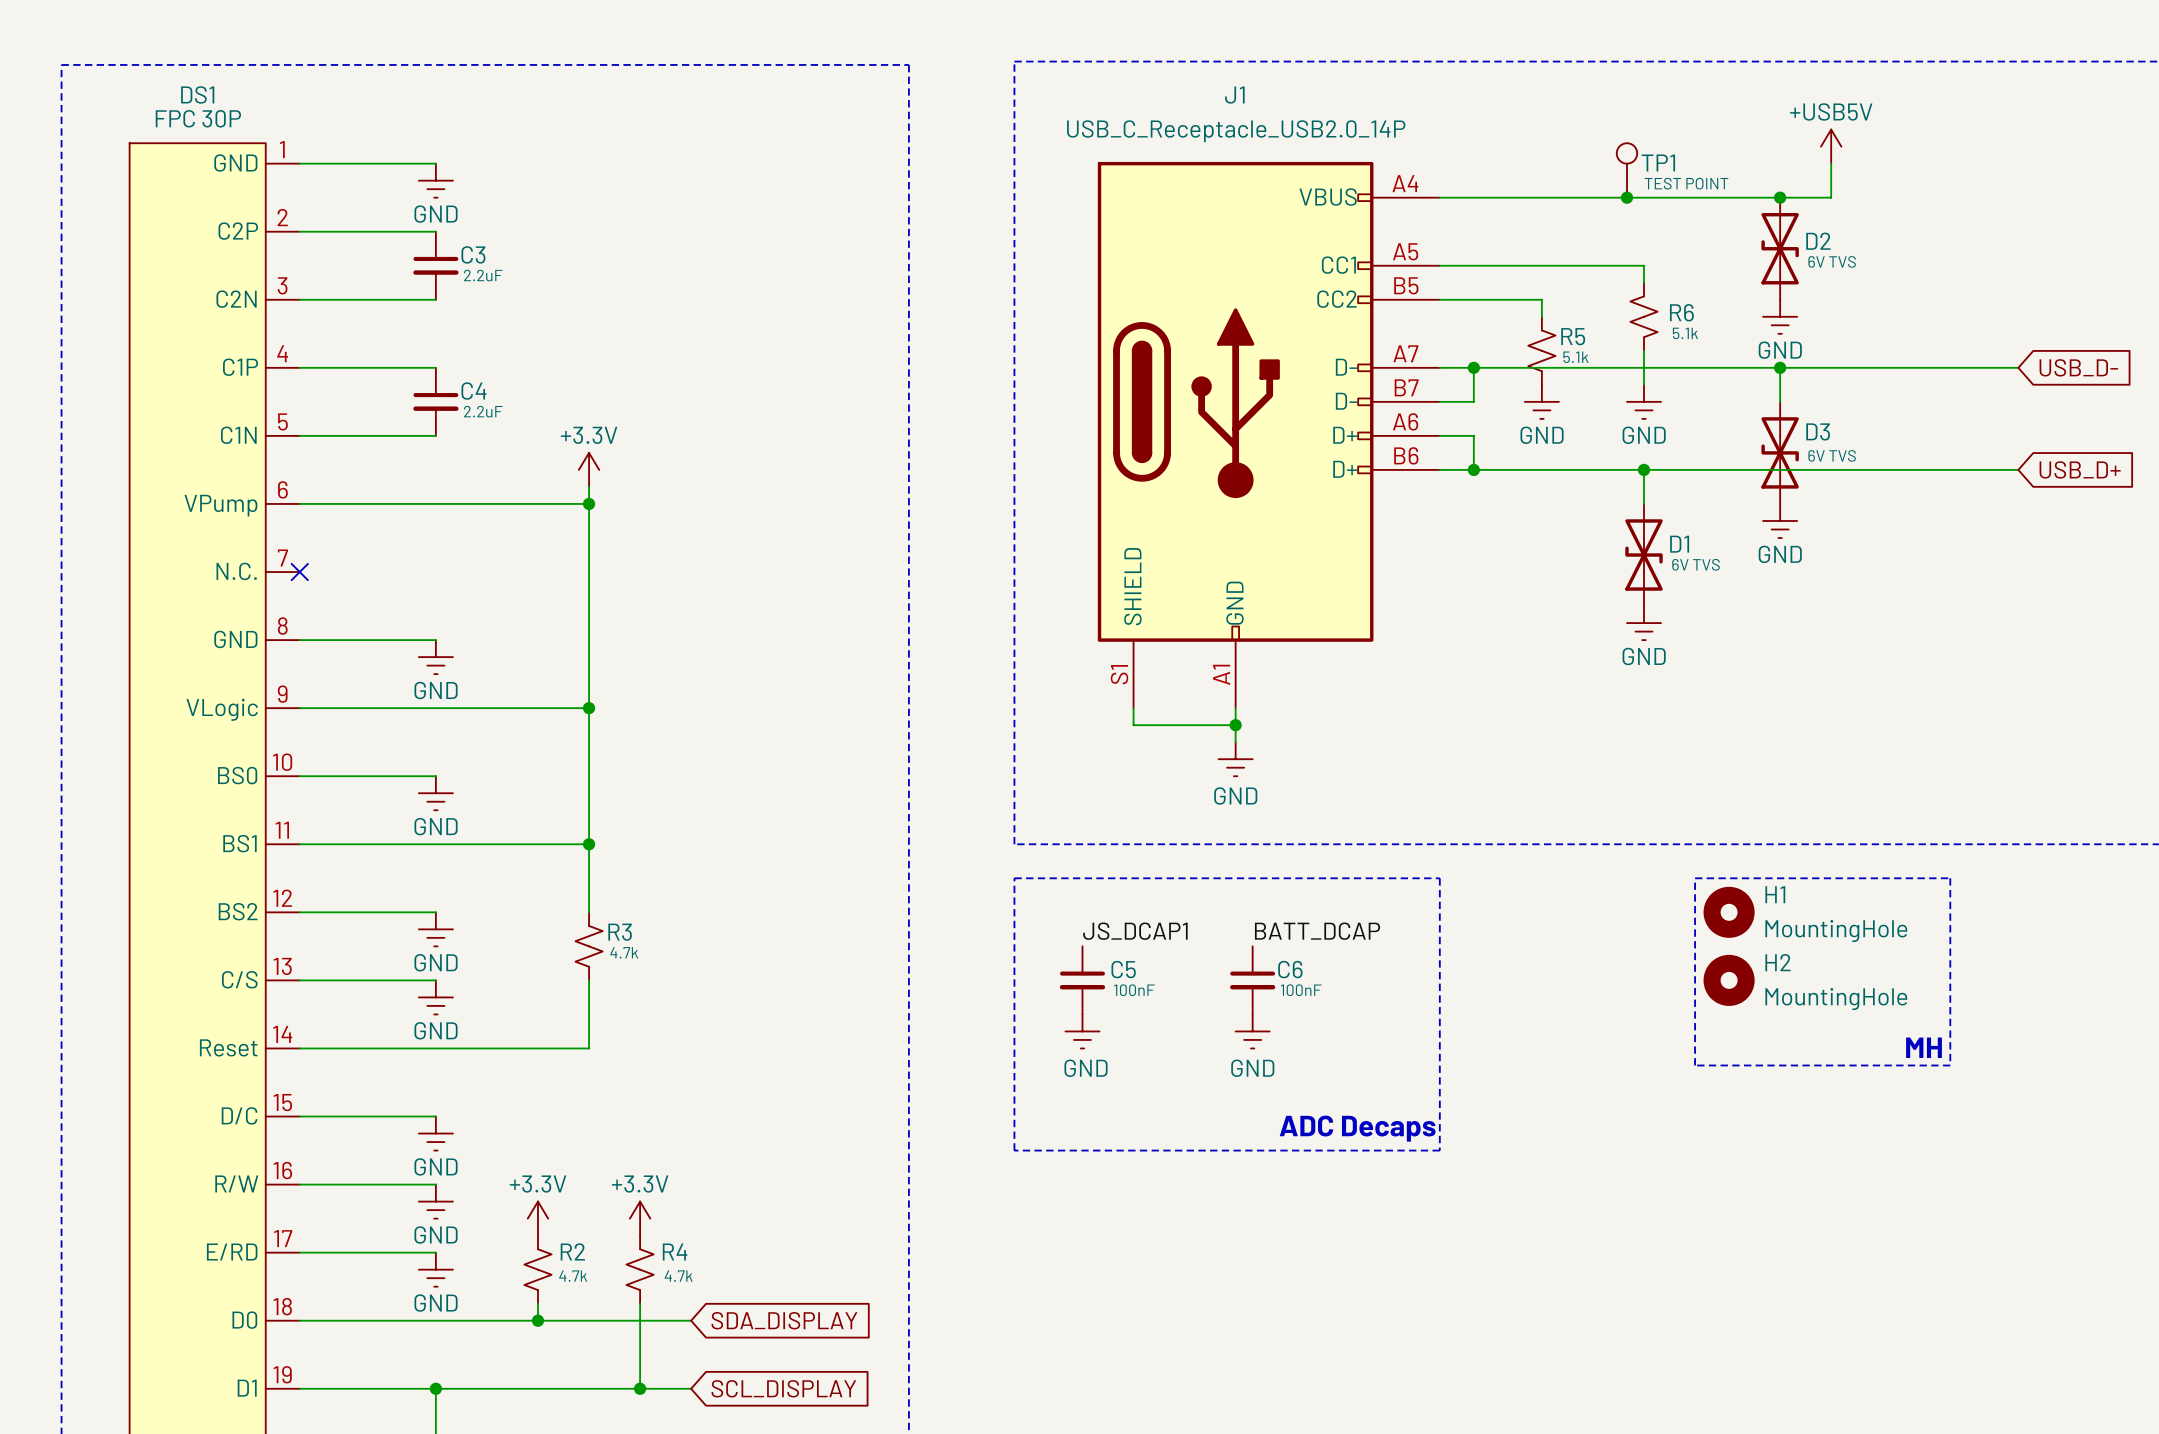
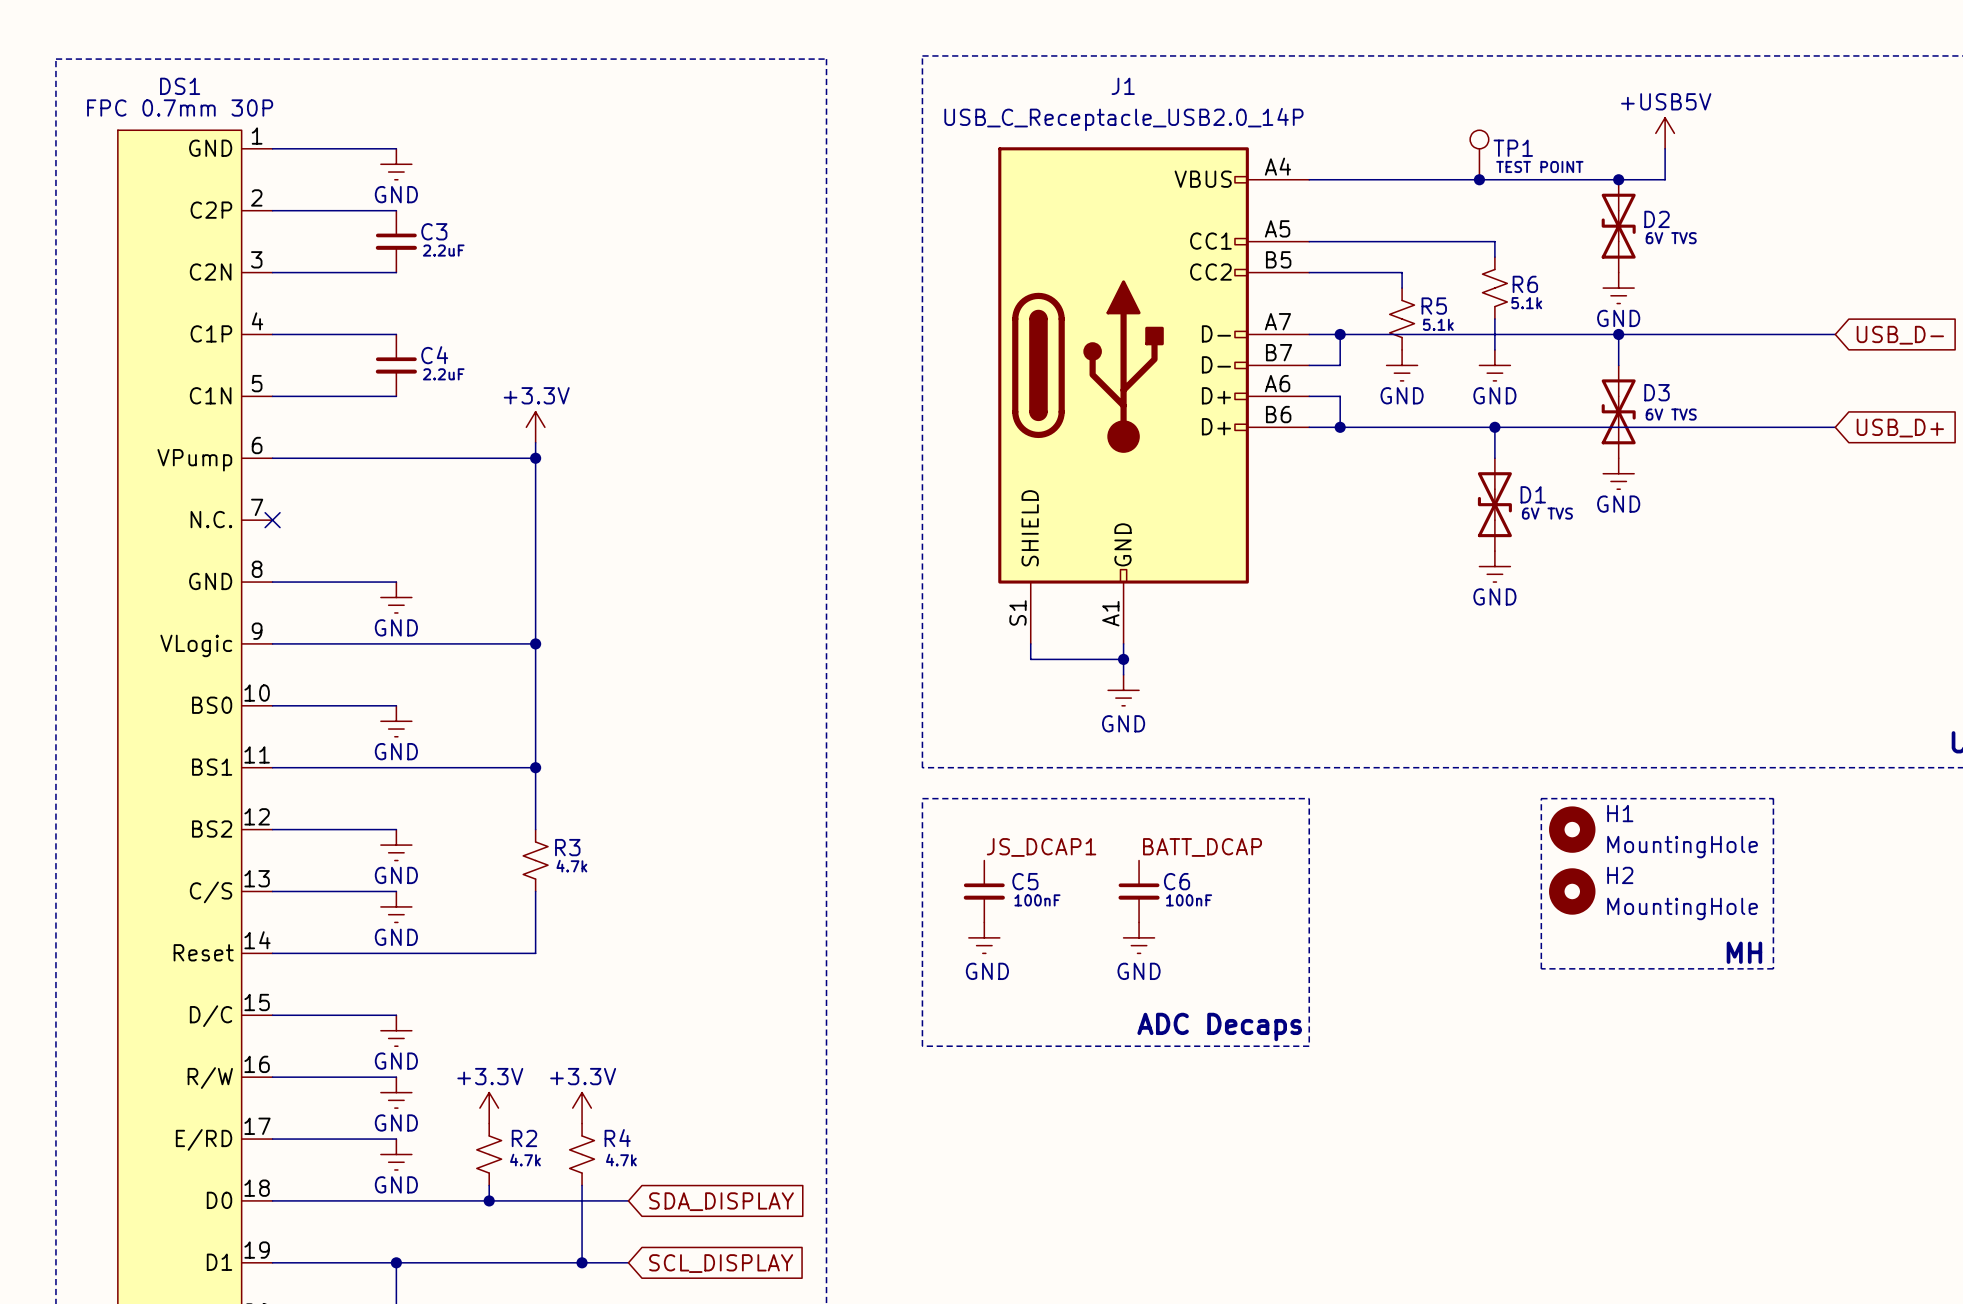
DS1 value: FPC 30P (198, 118) -> FPC 0.7mm 30P (180, 108)

